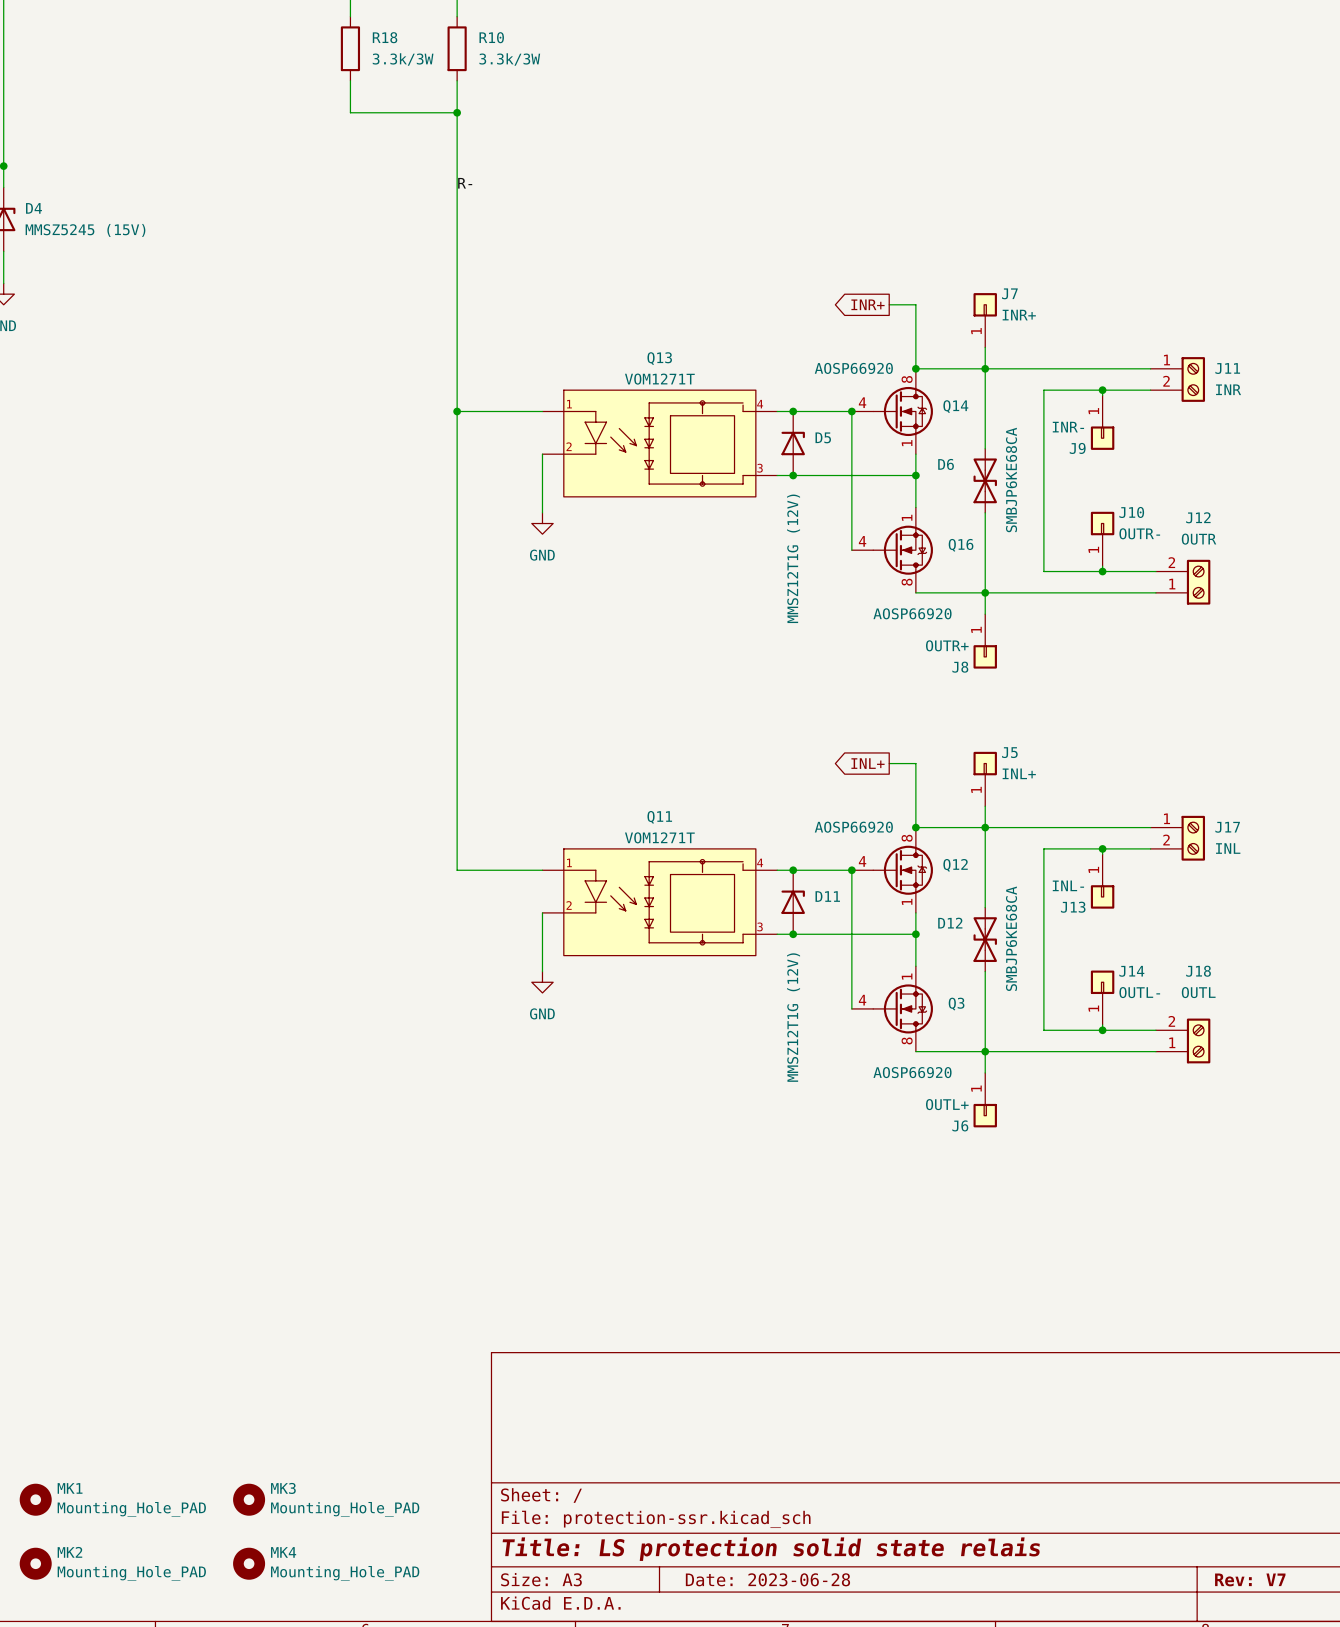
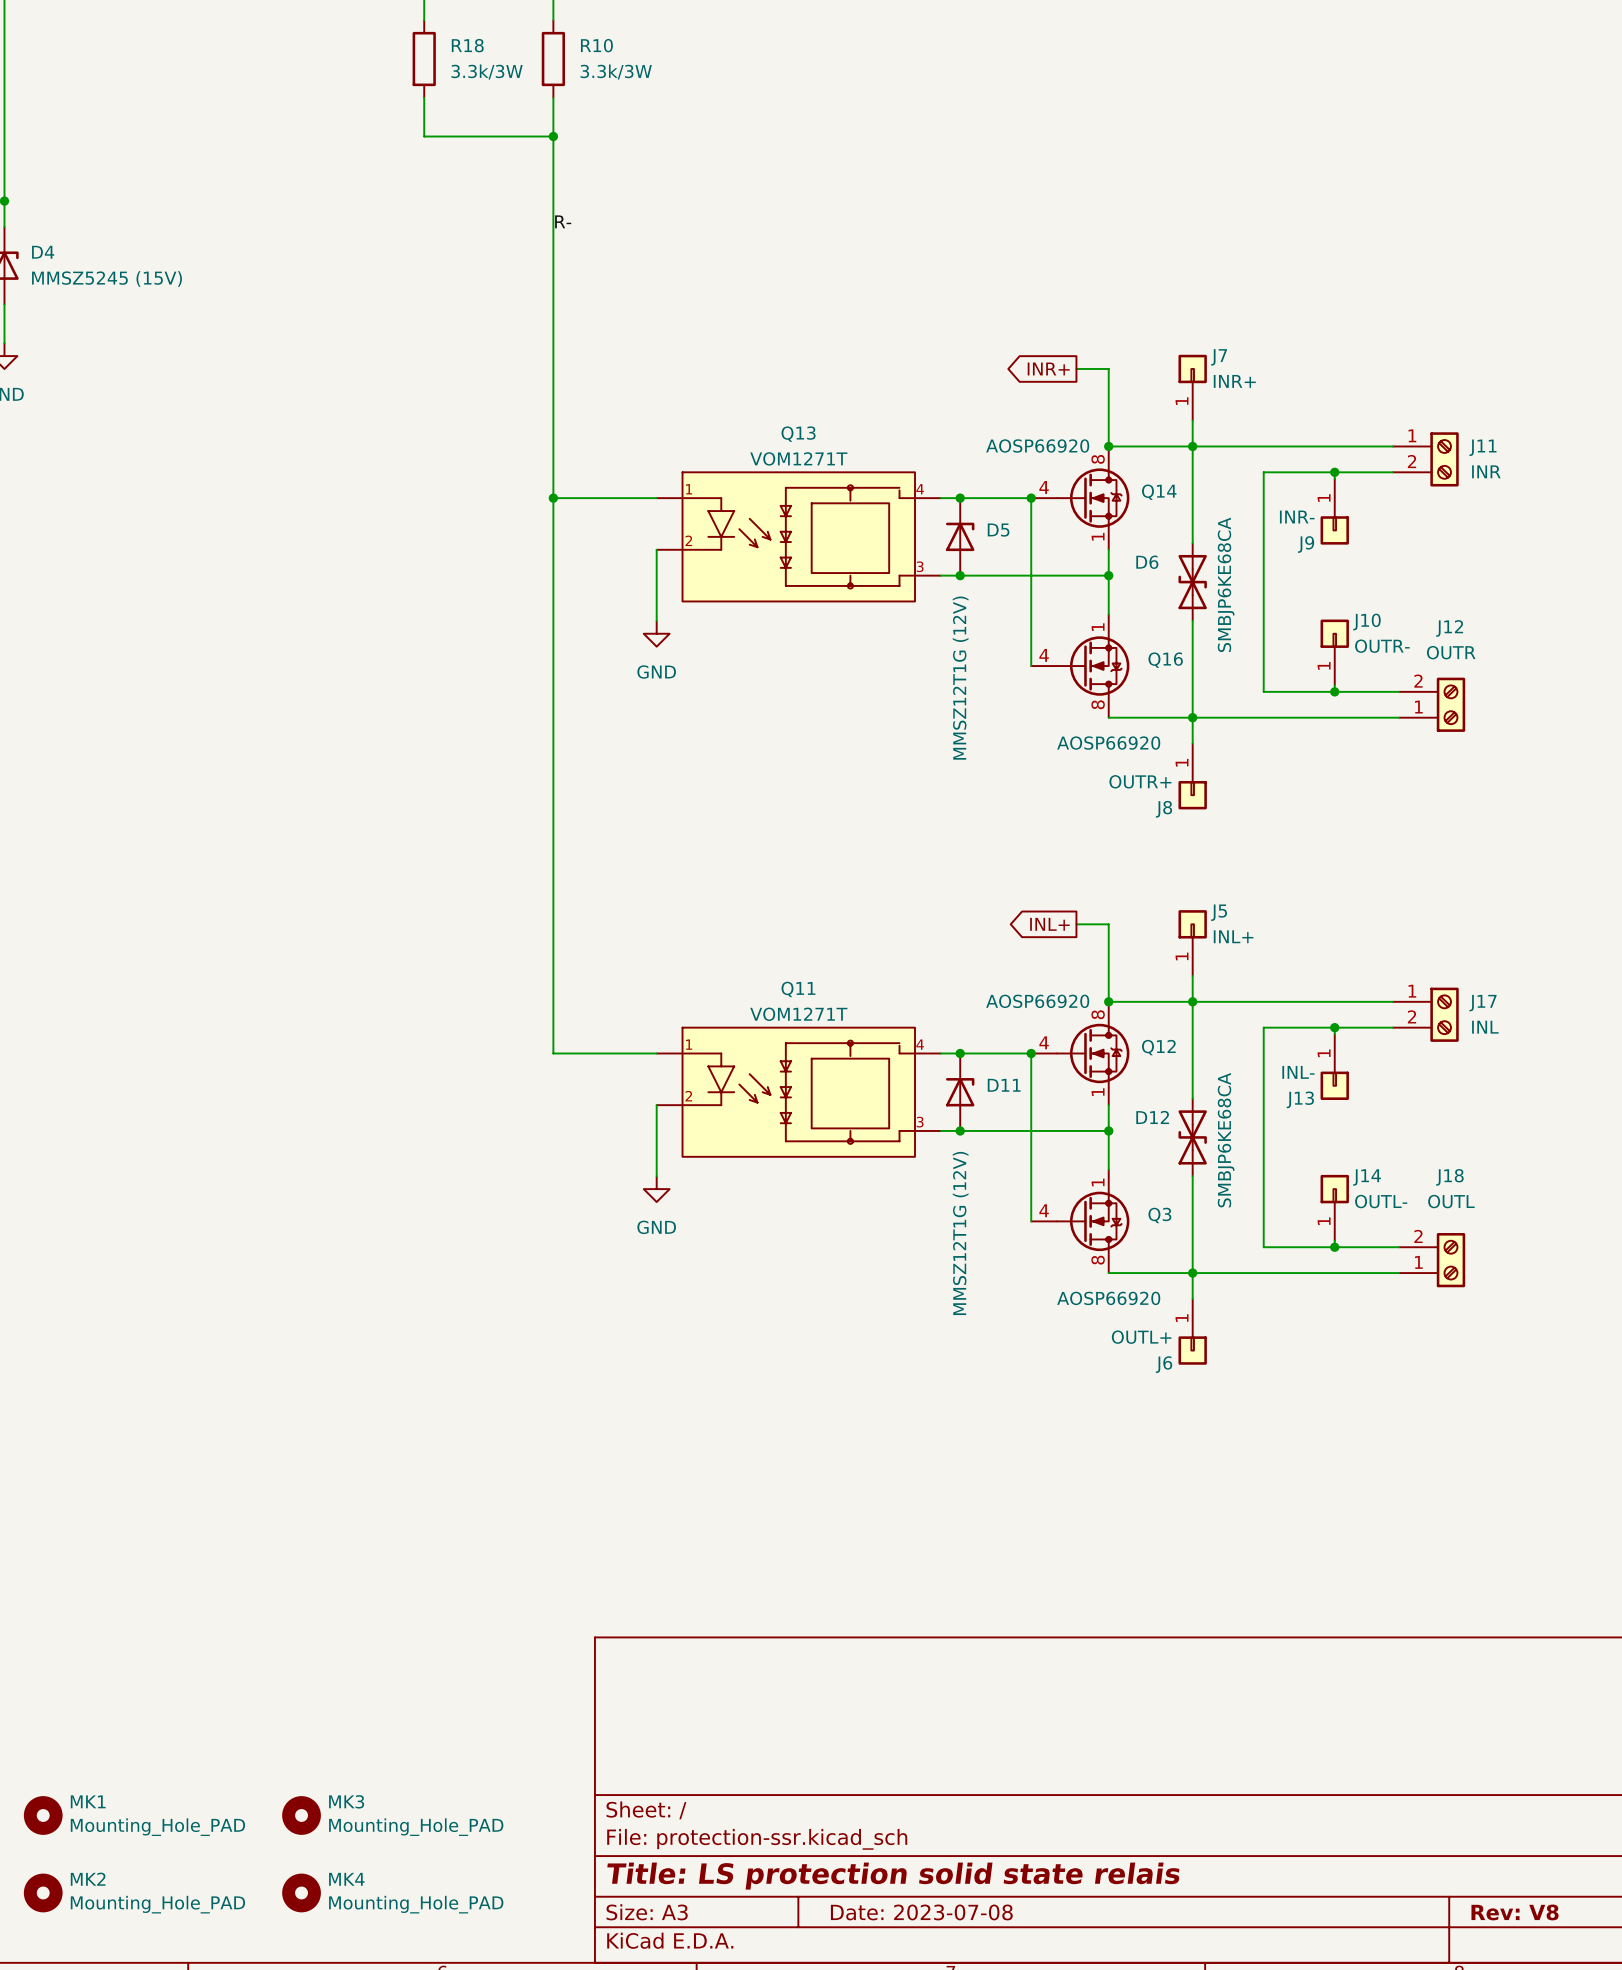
title block: Date: 2023-06-28 (767, 1579) -> Date: 2023-07-08 (921, 1912)
title block: Rev: V7 (1250, 1579) -> Rev: V8 (1515, 1912)

